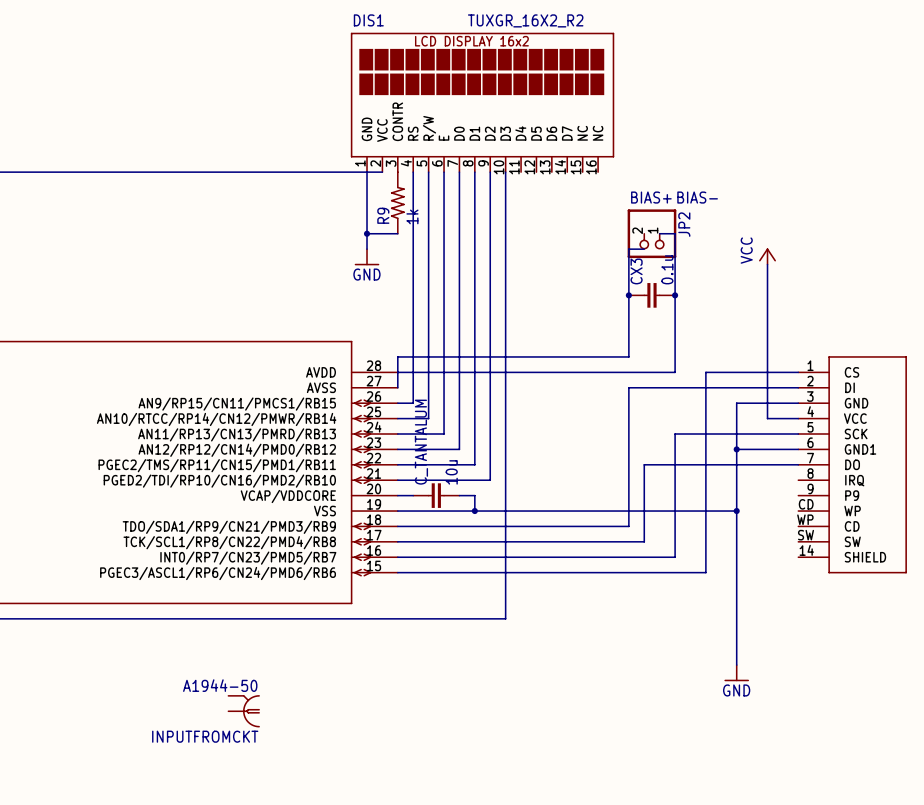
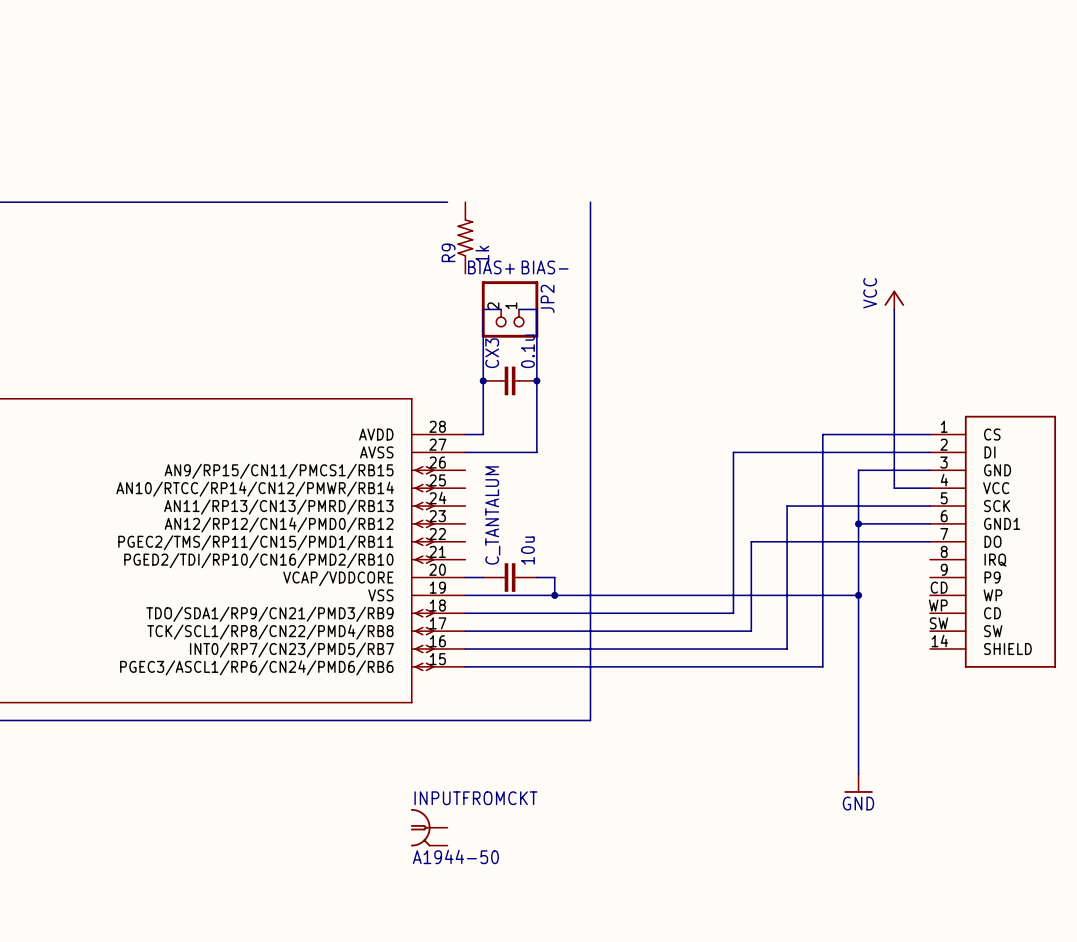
DIS1: TUXGR_16X2_R2 (482, 102) -> none
wire: (367, 172) (367, 249) -> none
wire: (413, 172) (413, 264) -> (501, 309) (483, 309)
wire: (428, 172) (428, 418) (397, 418) -> none
wire: (444, 172) (444, 434) (397, 434) -> none
wire: (459, 172) (459, 264) -> (518, 309) (536, 309)
wire: (474, 172) (474, 464) (397, 464) -> none
wire: (490, 172) (490, 480) (397, 480) -> none
text: BIAS+ (651, 197) -> none
text: BIAS- (697, 197) -> none
text: none -> BIAS+ (491, 267)
text: none -> BIAS- (545, 267)
wire: (367, 233) (397, 233) -> none
junction: (367, 233) -> none
JP2 position: (651, 233) -> (510, 309)
wire: (659, 233) (675, 233) (675, 372) (413, 372) (413, 403) (397, 403) -> none
wire: (644, 249) (628, 249) (628, 356) (397, 356) (397, 387) -> none
power symbol: GND (367, 257) -> none
junction: (628, 295) -> none
CX3 position: (651, 295) -> (510, 380)
junction: (675, 295) -> none
junction: none -> (483, 380)
junction: none -> (536, 380)
wire: (459, 387) (459, 449) (397, 449) -> (536, 452) (465, 452)
INPUTFROMCKT position: (244, 711) -> (429, 827)
INPUTFROMCKT rotation: 0° (251, 711) -> 180° (420, 827)

